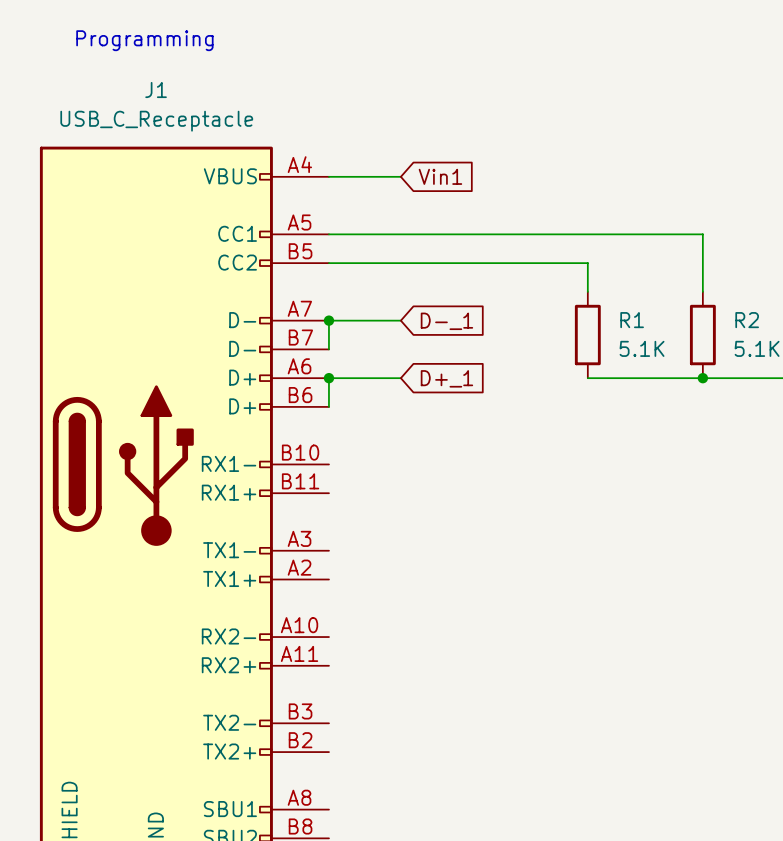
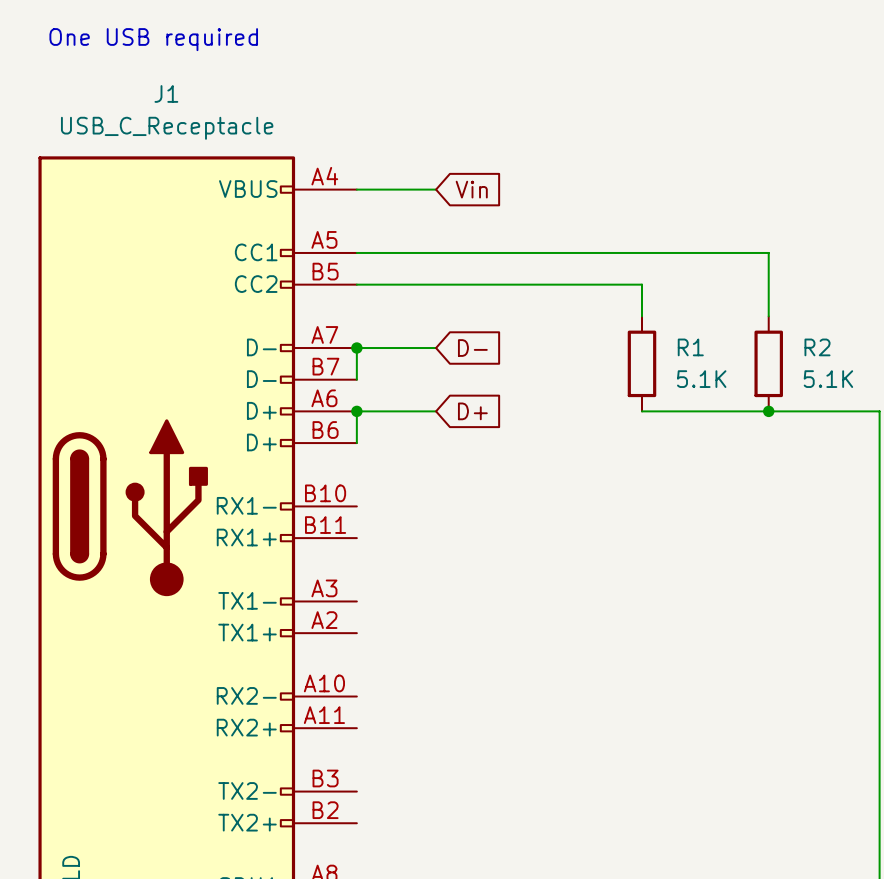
text: Programming (144, 40) -> One USB required (153, 39)
global label: Vin1 (440, 176) -> Vin (471, 189)
global label: D-_1 (446, 321) -> D- (472, 348)
global label: D+_1 (446, 378) -> D+ (472, 411)

